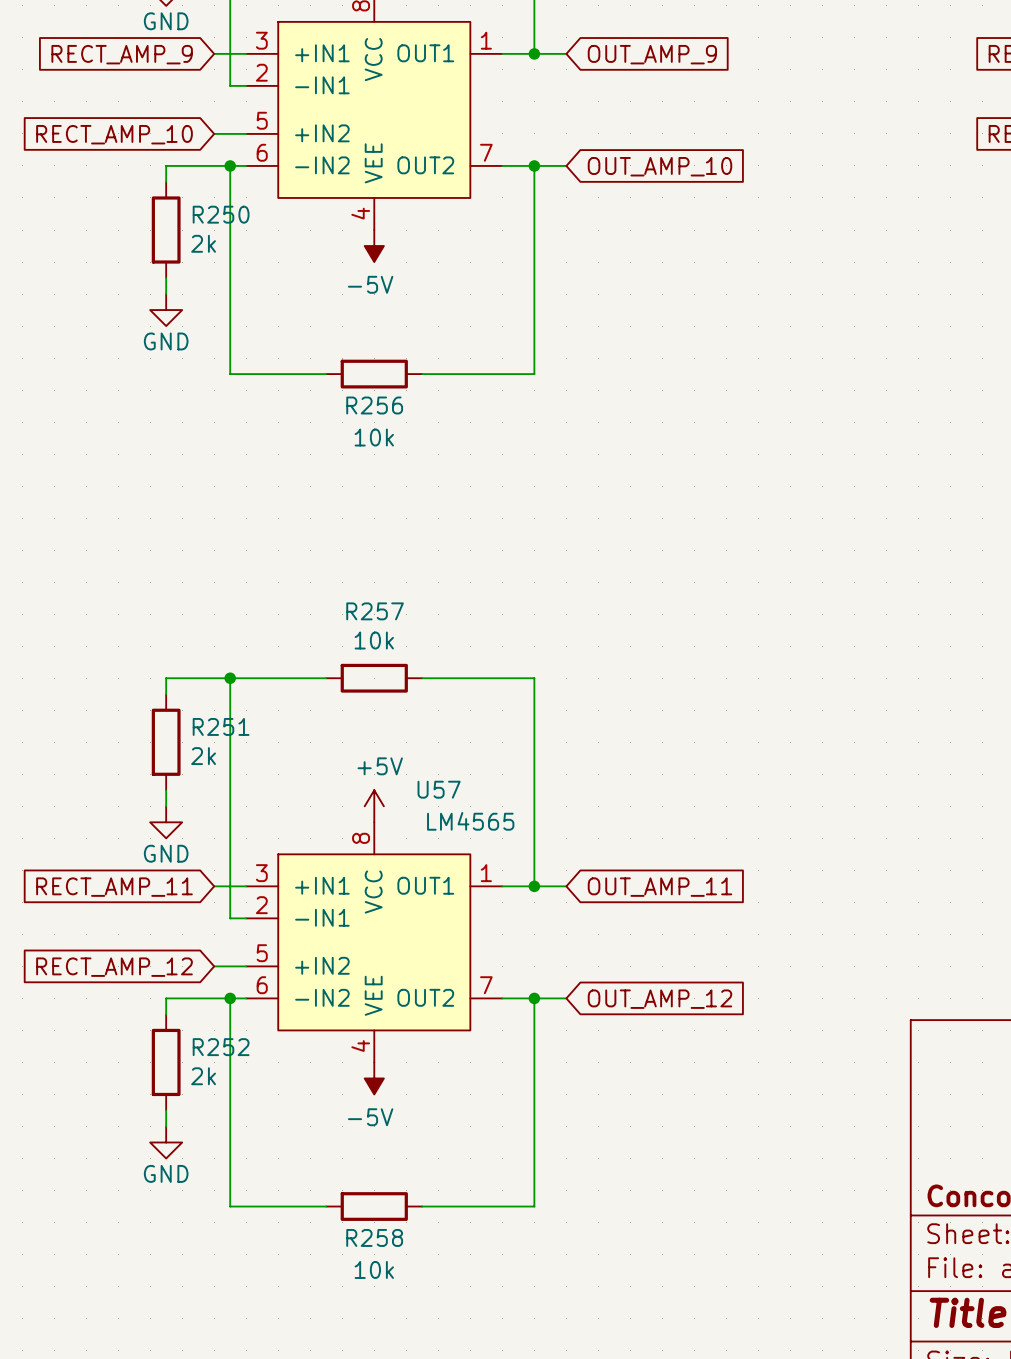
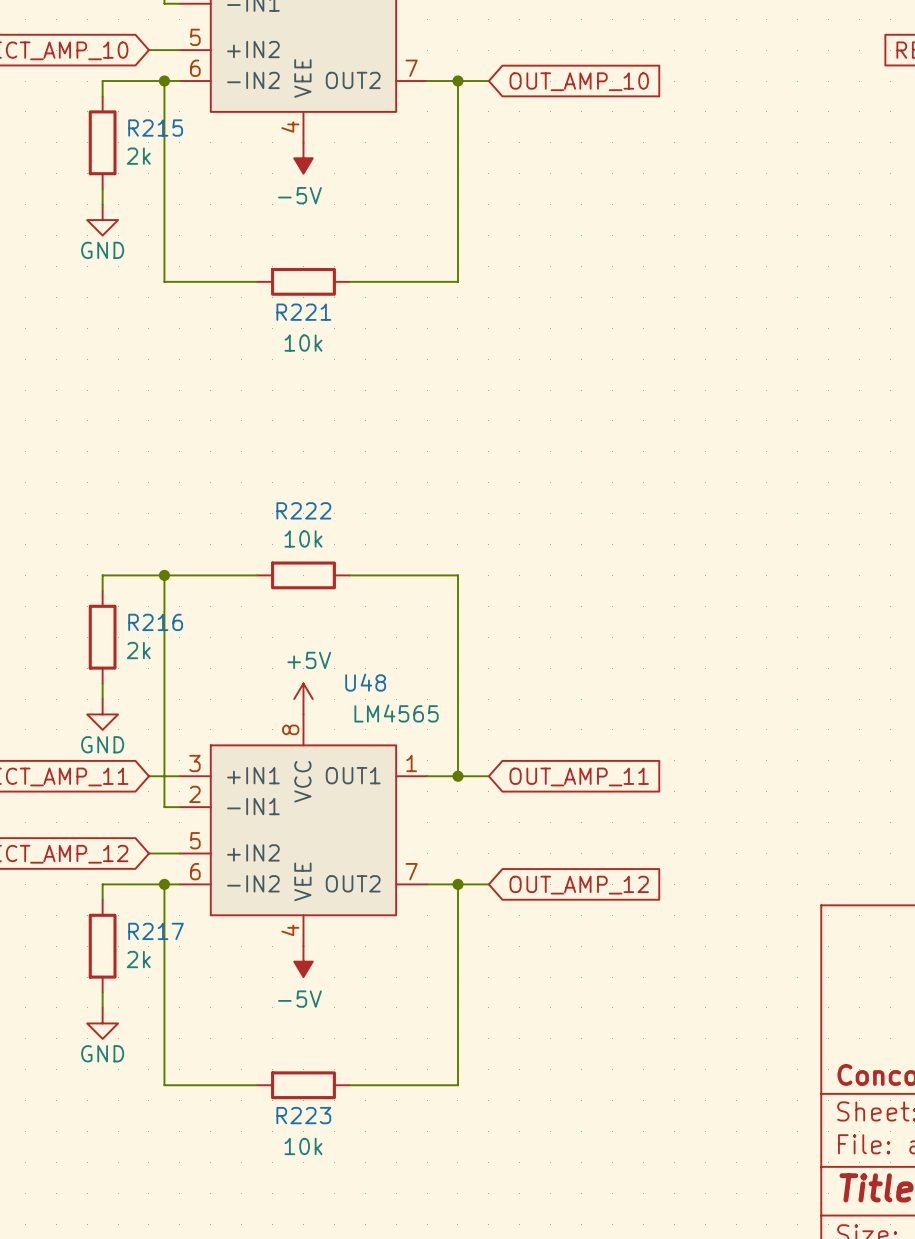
R250 name: R250 (221, 214) -> R215 (155, 128)
R256 name: R256 (374, 405) -> R221 (303, 312)
R257 name: R257 (375, 611) -> R222 (303, 510)
R251 name: R251 (221, 726) -> R216 (155, 622)
U57 name: U57 (439, 789) -> U48 (365, 682)
R252 name: R252 (221, 1047) -> R217 (156, 931)
R258 name: R258 (374, 1237) -> R223 (303, 1115)

